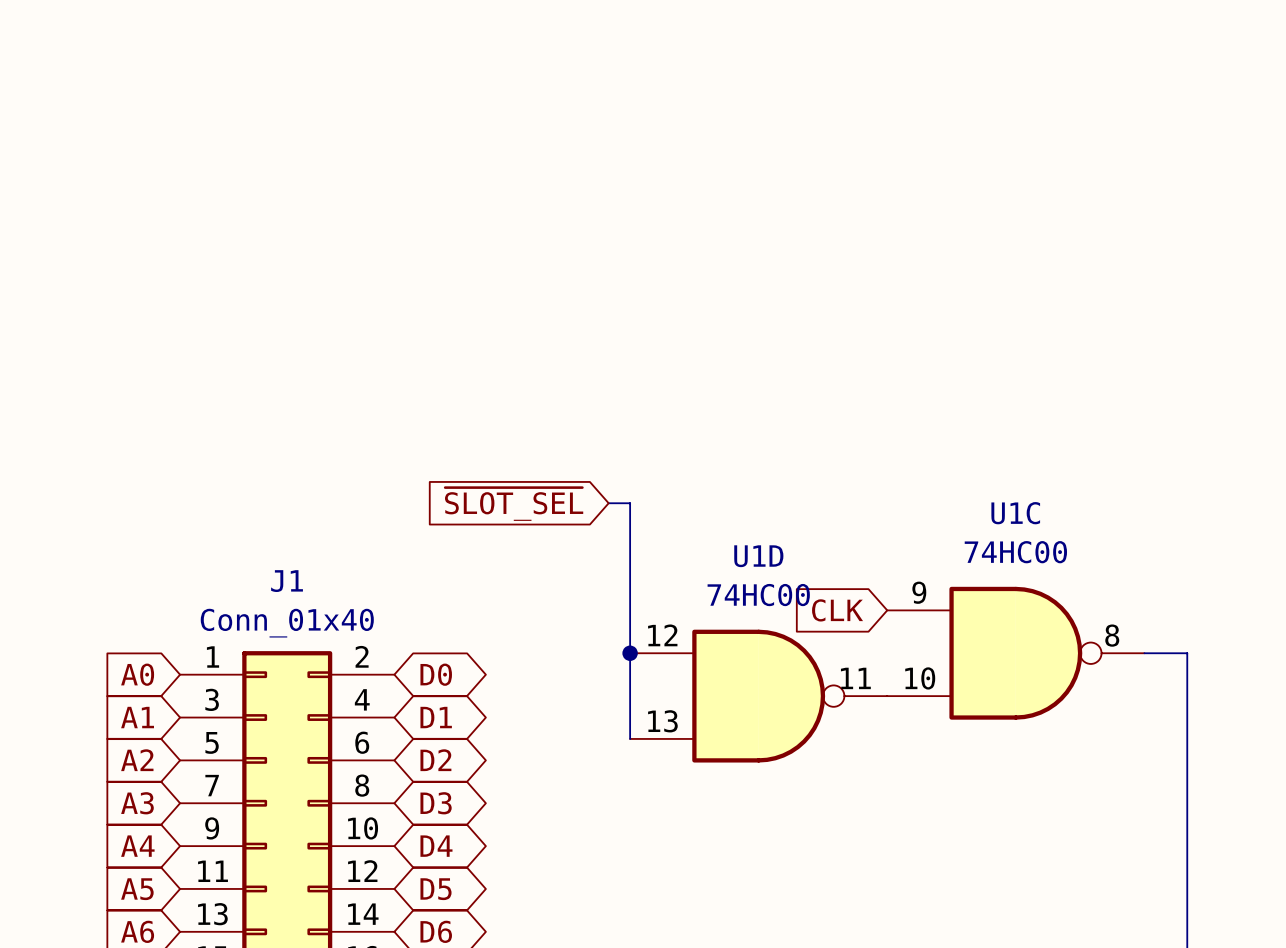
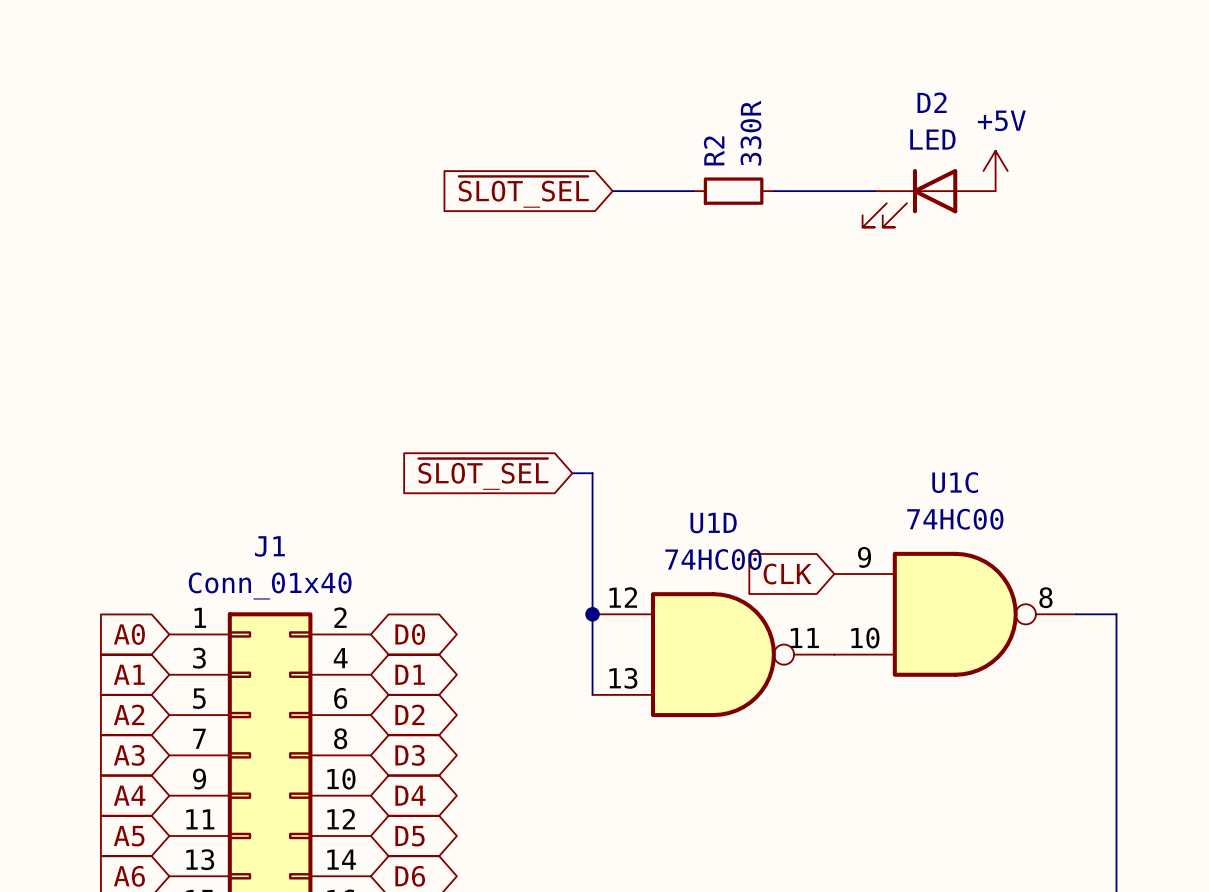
power symbol: none -> +5V (995, 170)
wire: none -> (612, 191) (693, 191)
R2: none -> 330R (733, 191)
wire: none -> (773, 191) (874, 191)
global label: none -> ~{SLOT_SEL} (523, 192)
D2: none -> LED (929, 198)

